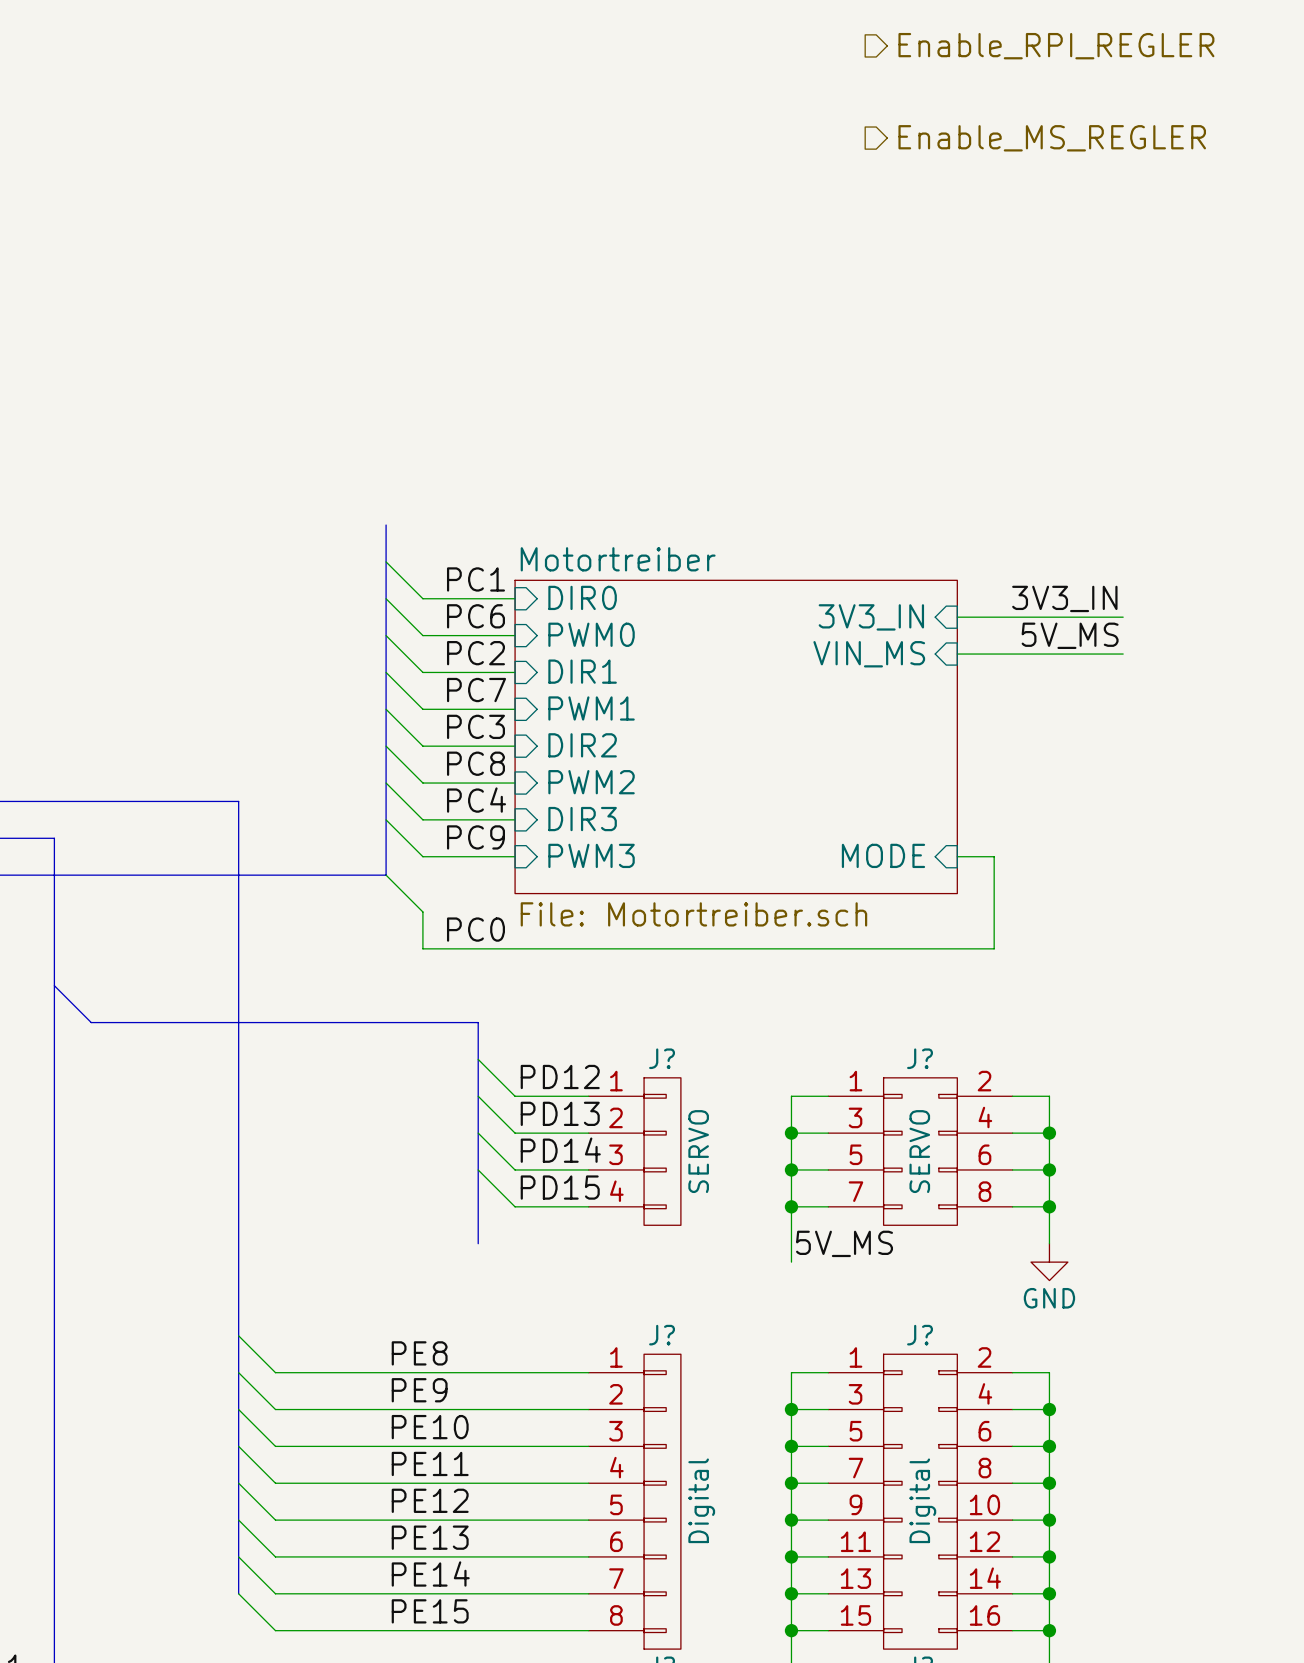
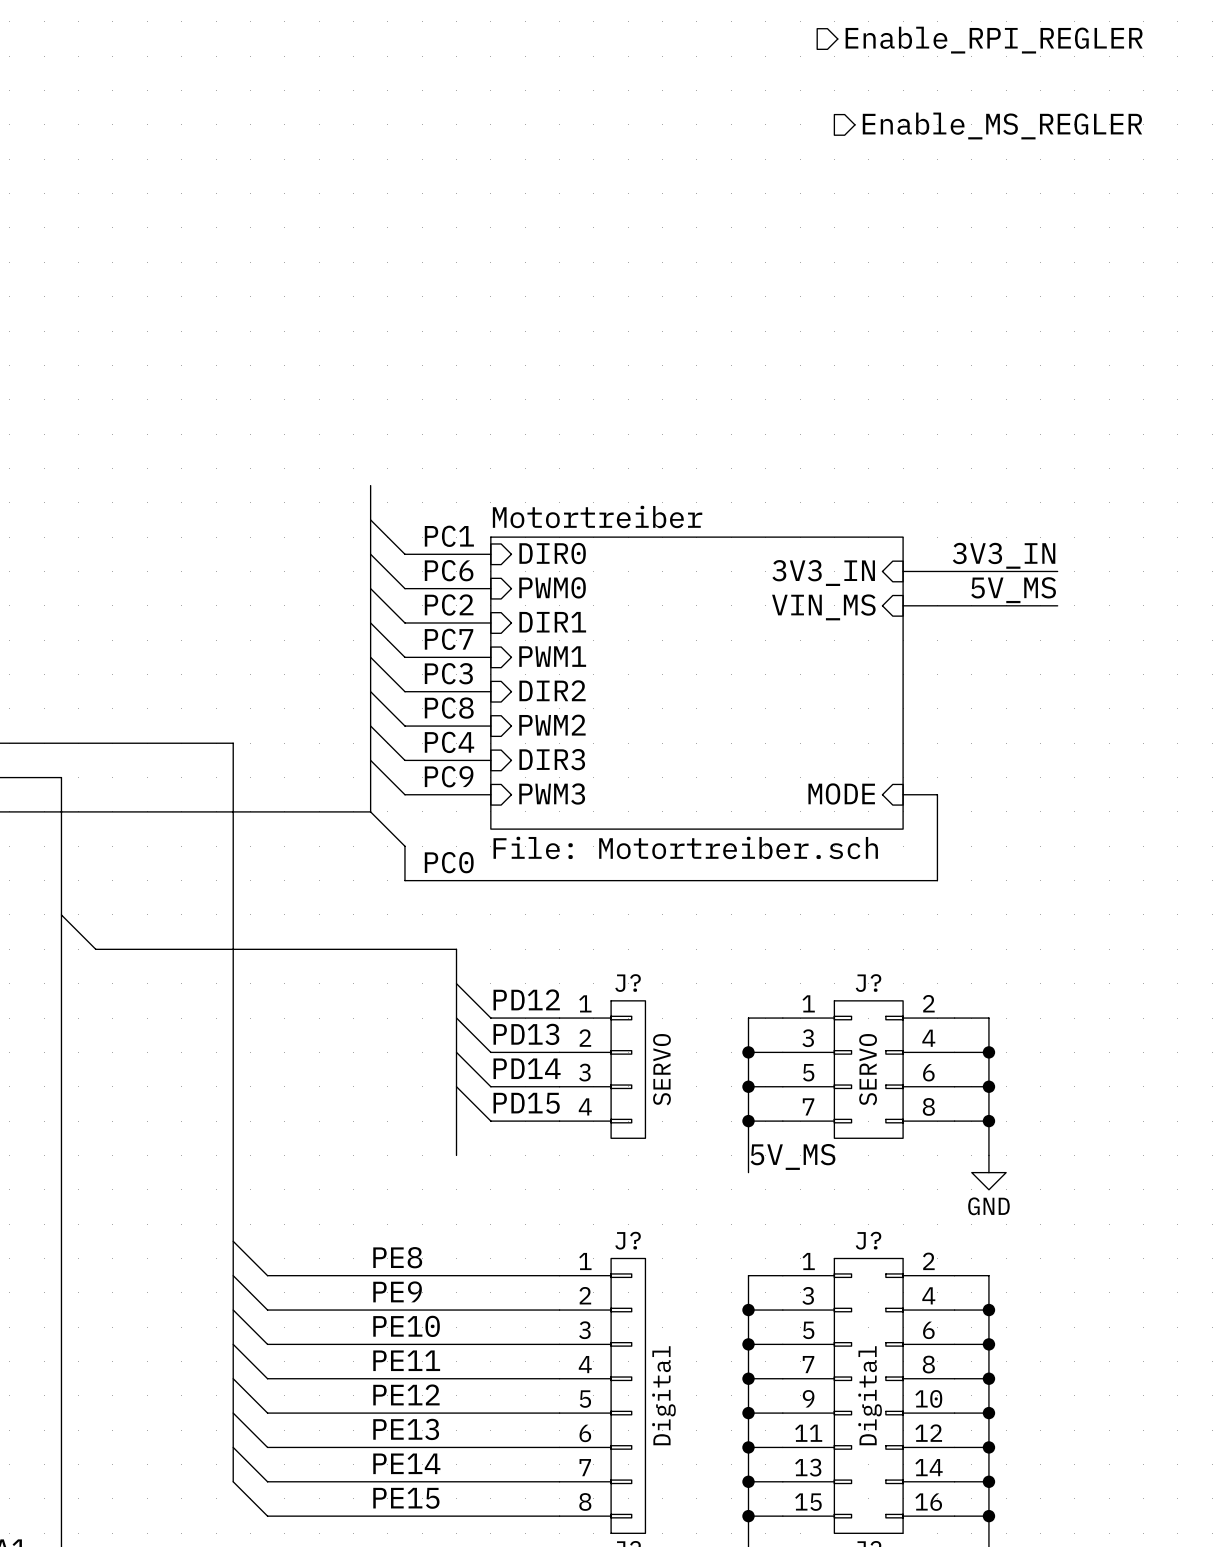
hierarchical label position: Enable_MS_REGLER (1052, 138) -> Enable_MS_REGLER (1002, 126)

